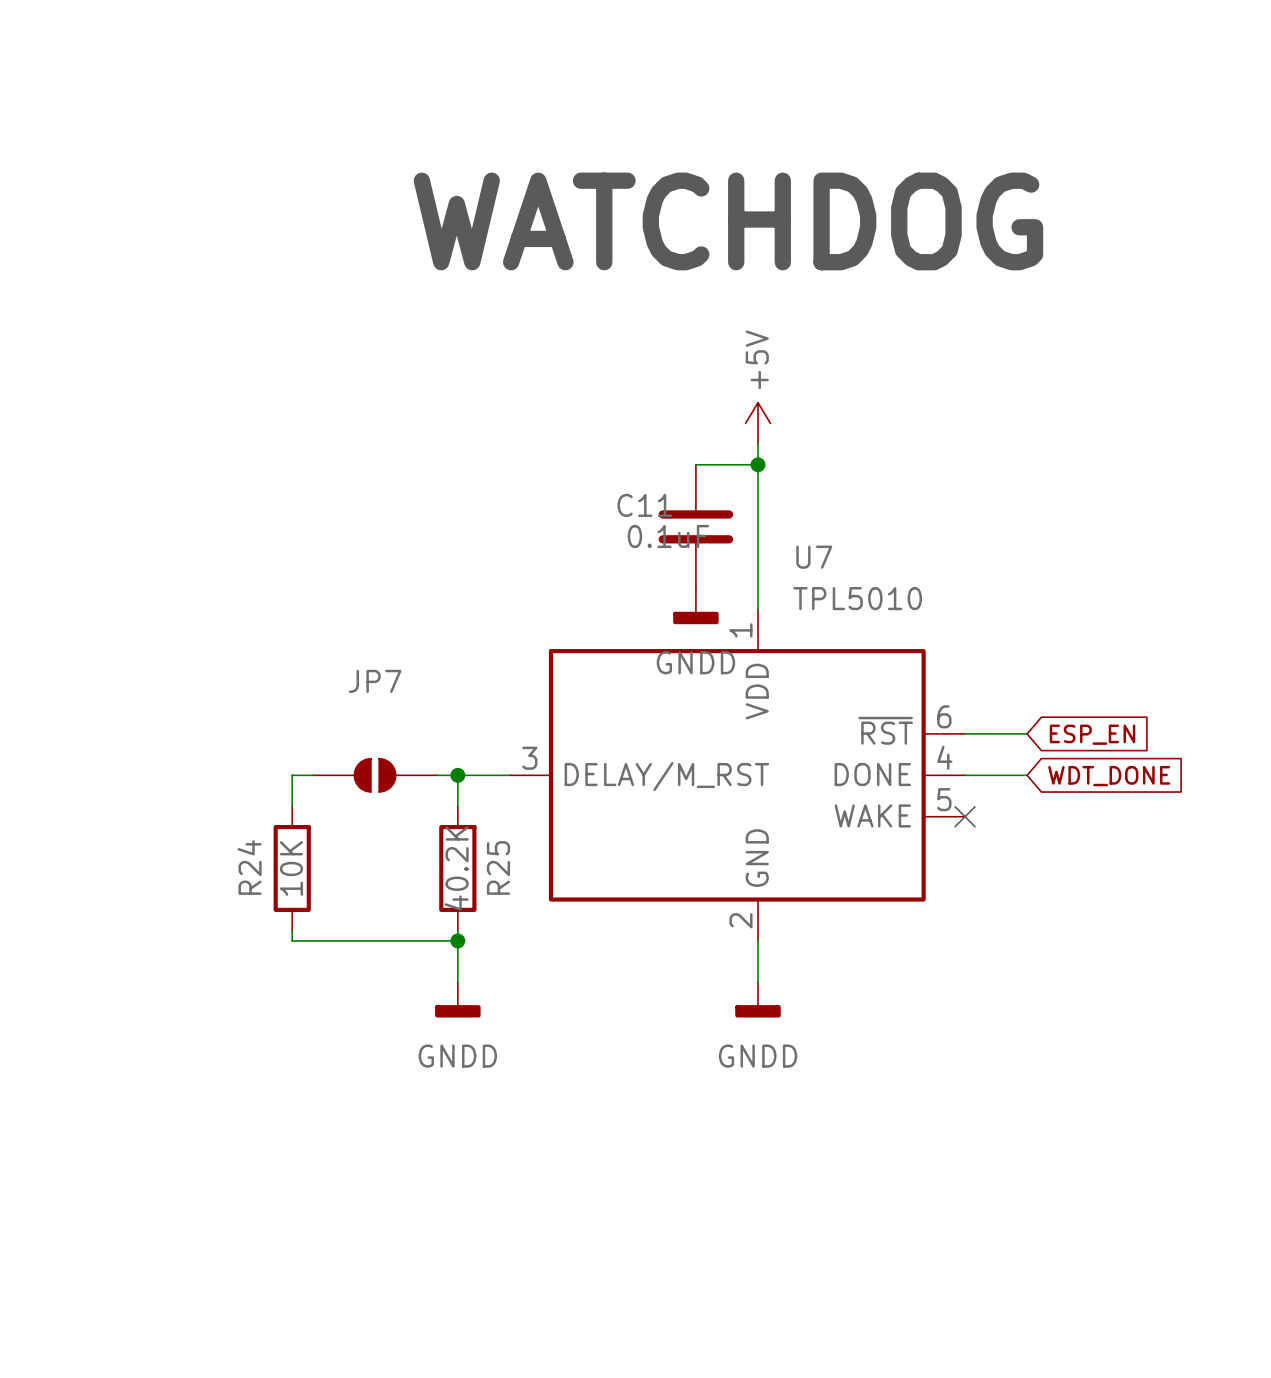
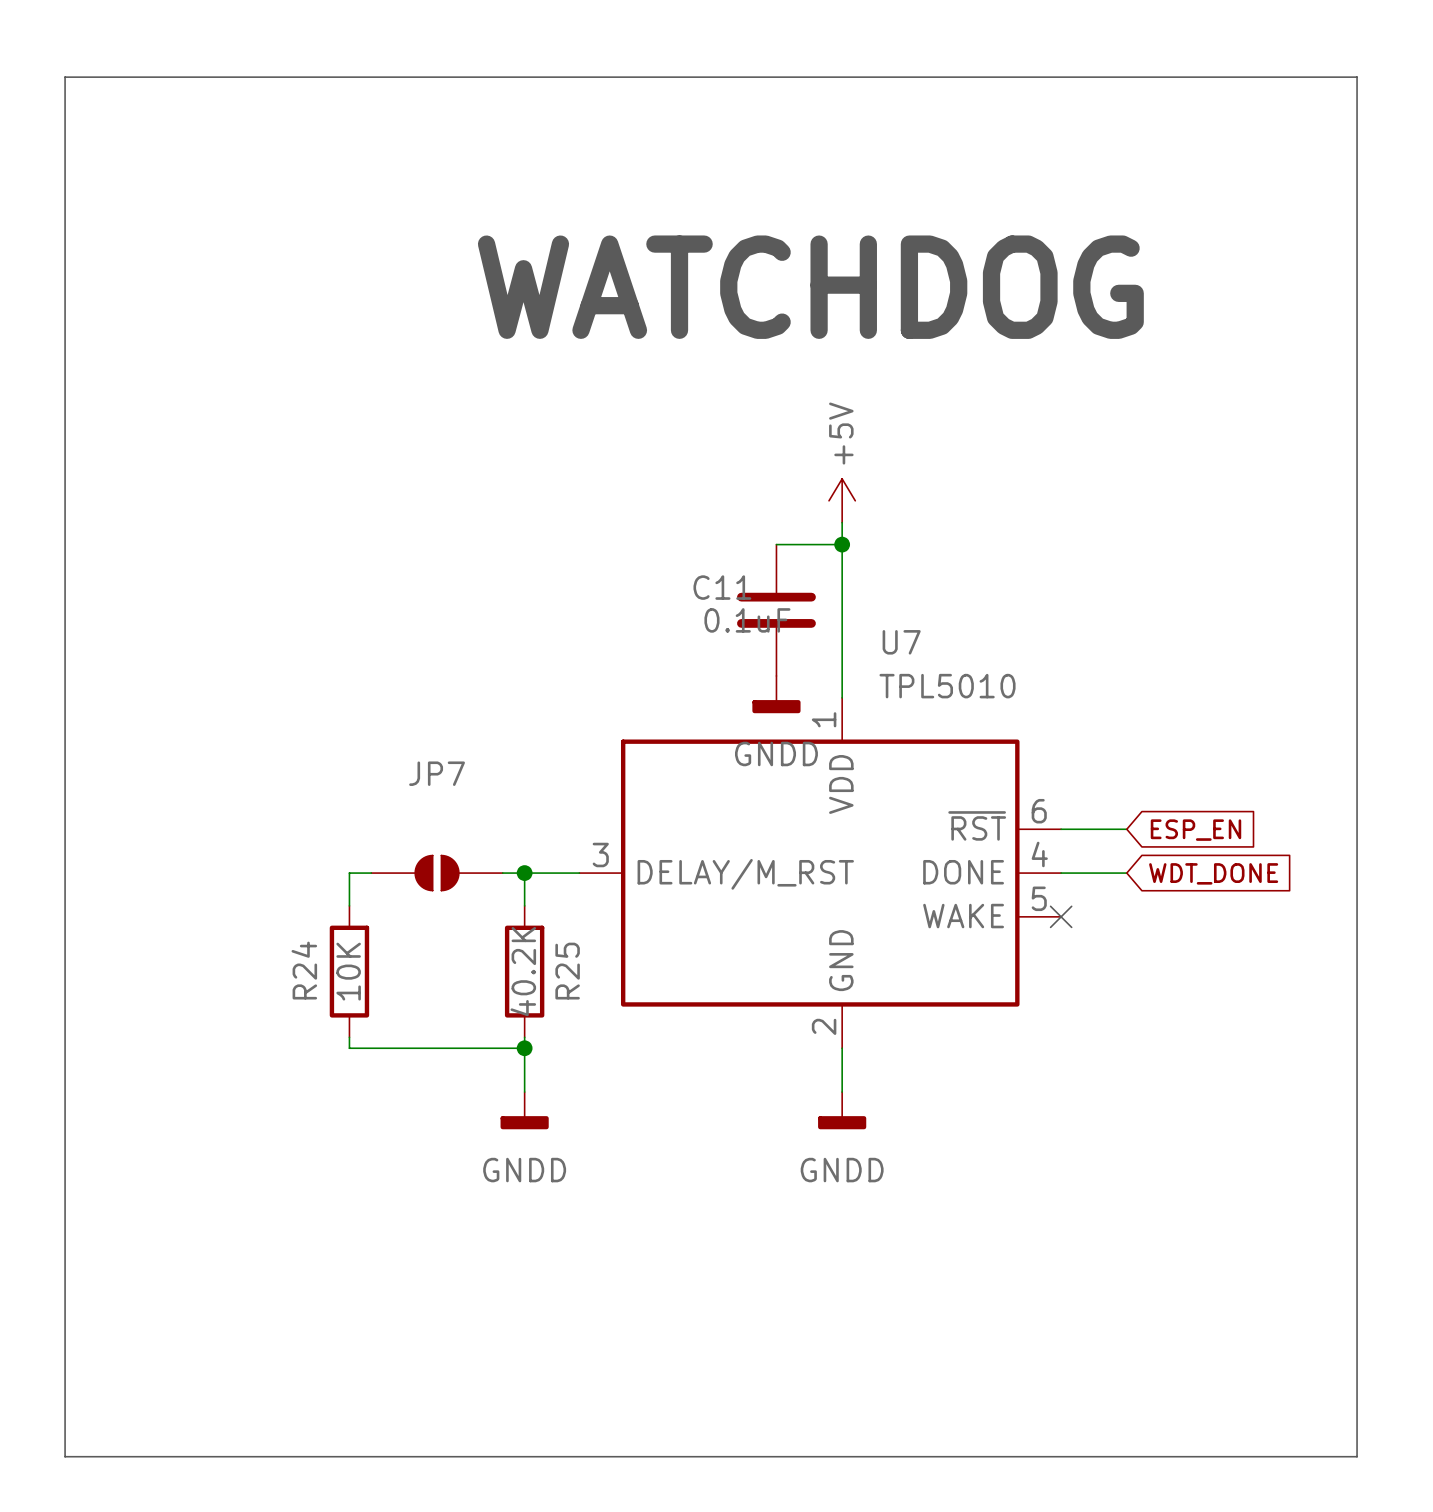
line: none -> (65, 77) (1357, 77) (1357, 1456) (65, 1456) (65, 77)

